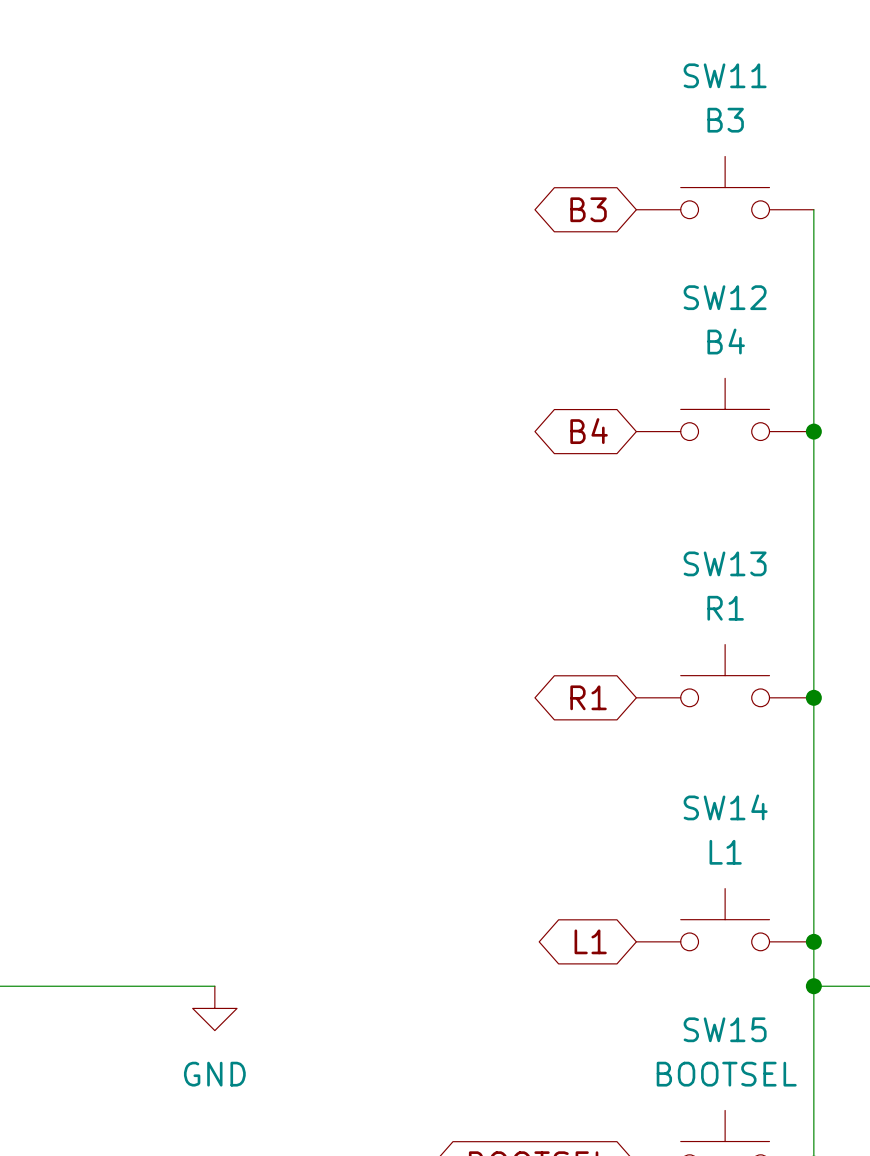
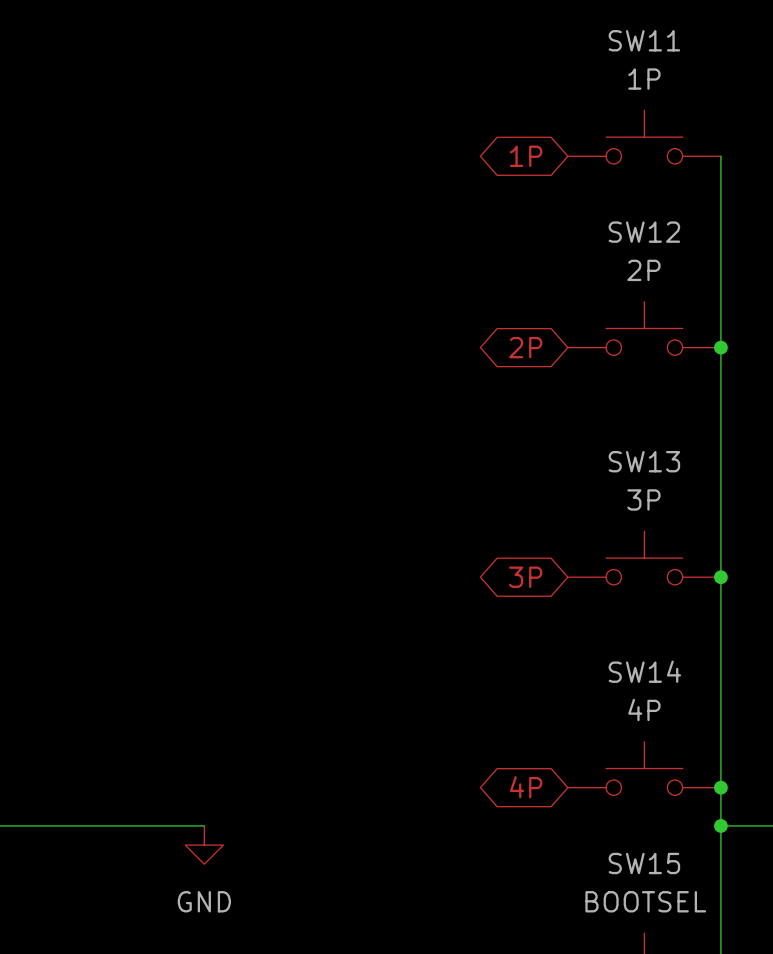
SW11 value: B3 (725, 120) -> 1P (644, 79)
global label: B3 (588, 209) -> 1P (526, 156)
SW12 value: B4 (726, 341) -> 2P (643, 270)
global label: B4 (589, 431) -> 2P (525, 347)
SW13 value: R1 (725, 608) -> 3P (643, 499)
global label: R1 (588, 697) -> 3P (525, 577)
SW14 value: L1 (725, 852) -> 4P (644, 709)
global label: L1 (590, 941) -> 4P (526, 787)

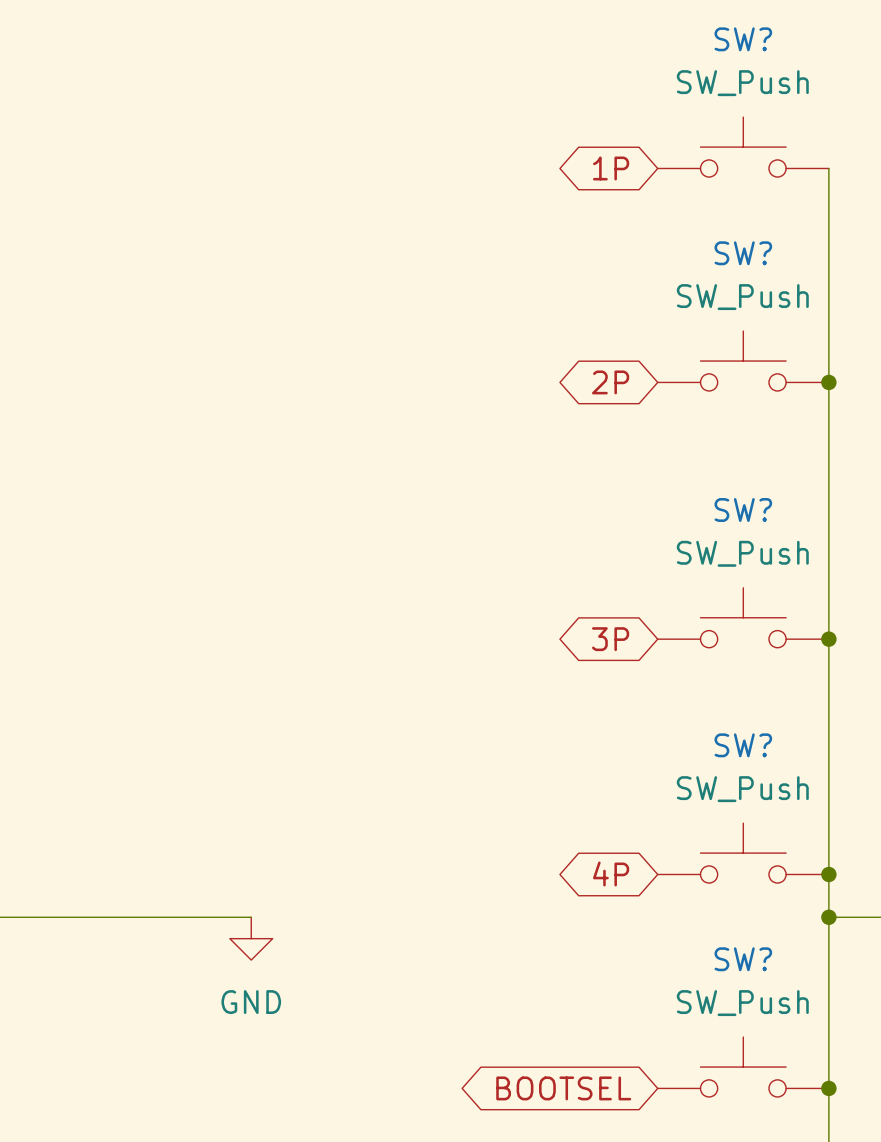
SW11 name: SW11 (644, 40) -> SW? (743, 39)
SW11 value: 1P (644, 79) -> SW_Push (742, 83)
SW12 name: SW12 (644, 232) -> SW? (743, 253)
SW12 value: 2P (643, 270) -> SW_Push (742, 297)
SW13 name: SW13 (644, 461) -> SW? (743, 509)
SW13 value: 3P (643, 499) -> SW_Push (742, 553)
SW14 name: SW14 (644, 671) -> SW? (743, 745)
SW14 value: 4P (644, 709) -> SW_Push (742, 789)
SW15 name: SW15 (644, 863) -> SW? (743, 959)
SW15 value: BOOTSEL (645, 901) -> SW_Push (742, 1003)

